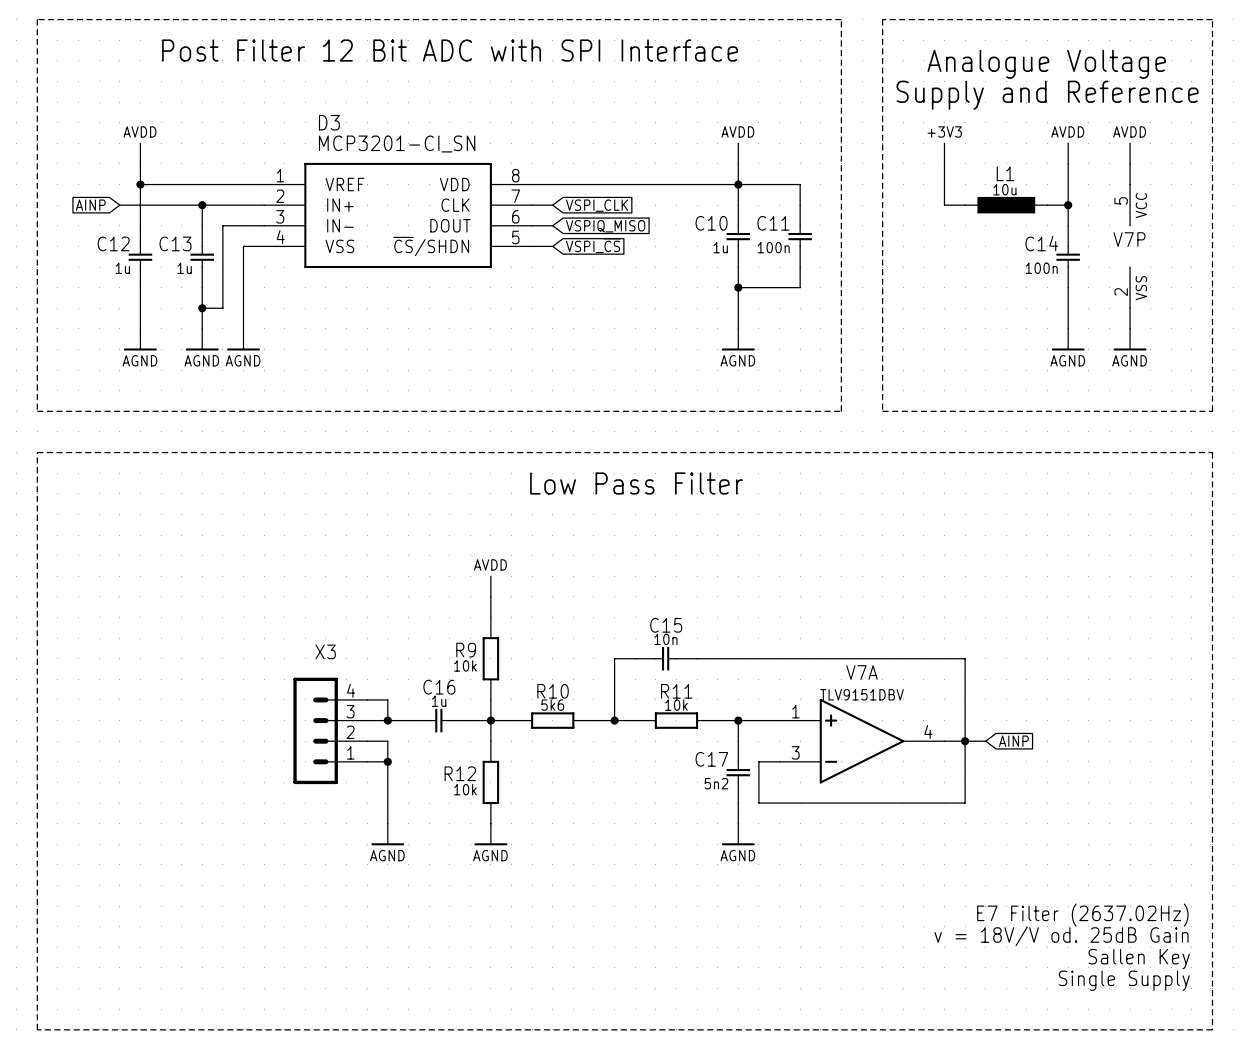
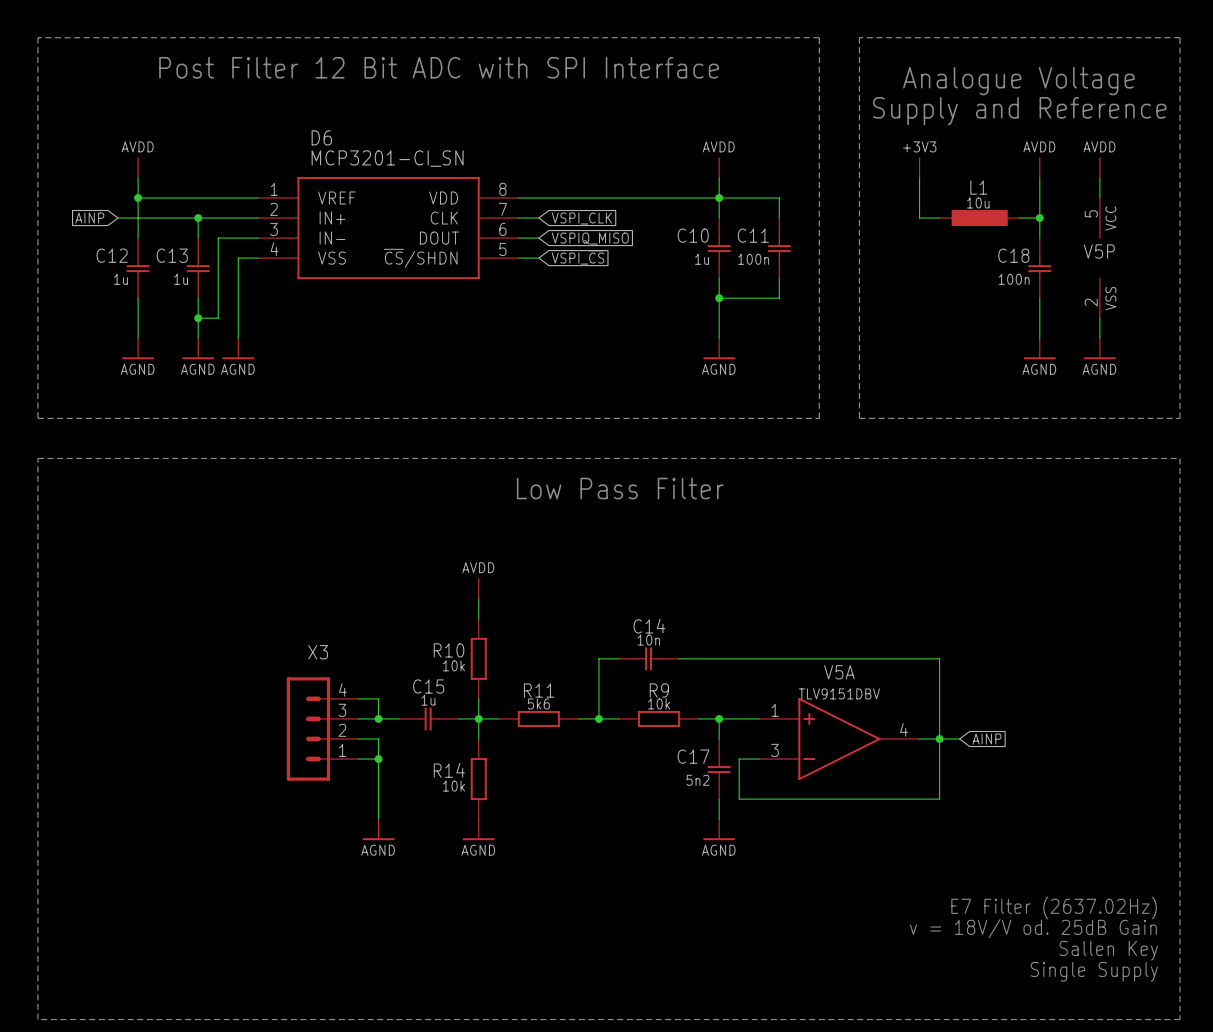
D3 name: D3 (329, 122) -> D6 (321, 137)
V7P name: V7P (1129, 239) -> V5P (1099, 251)
C14 name: C14 (1041, 243) -> C18 (1013, 255)
C15 name: C15 (666, 625) -> C14 (649, 626)
R9 name: R9 (466, 650) -> R10 (449, 650)
V7A name: V7A (862, 672) -> V5A (839, 672)
C16 name: C16 (439, 687) -> C15 (428, 686)
R10 name: R10 (553, 691) -> R11 (539, 690)
R11 name: R11 (676, 691) -> R9 (659, 690)
R12 name: R12 (460, 773) -> R14 (449, 770)

